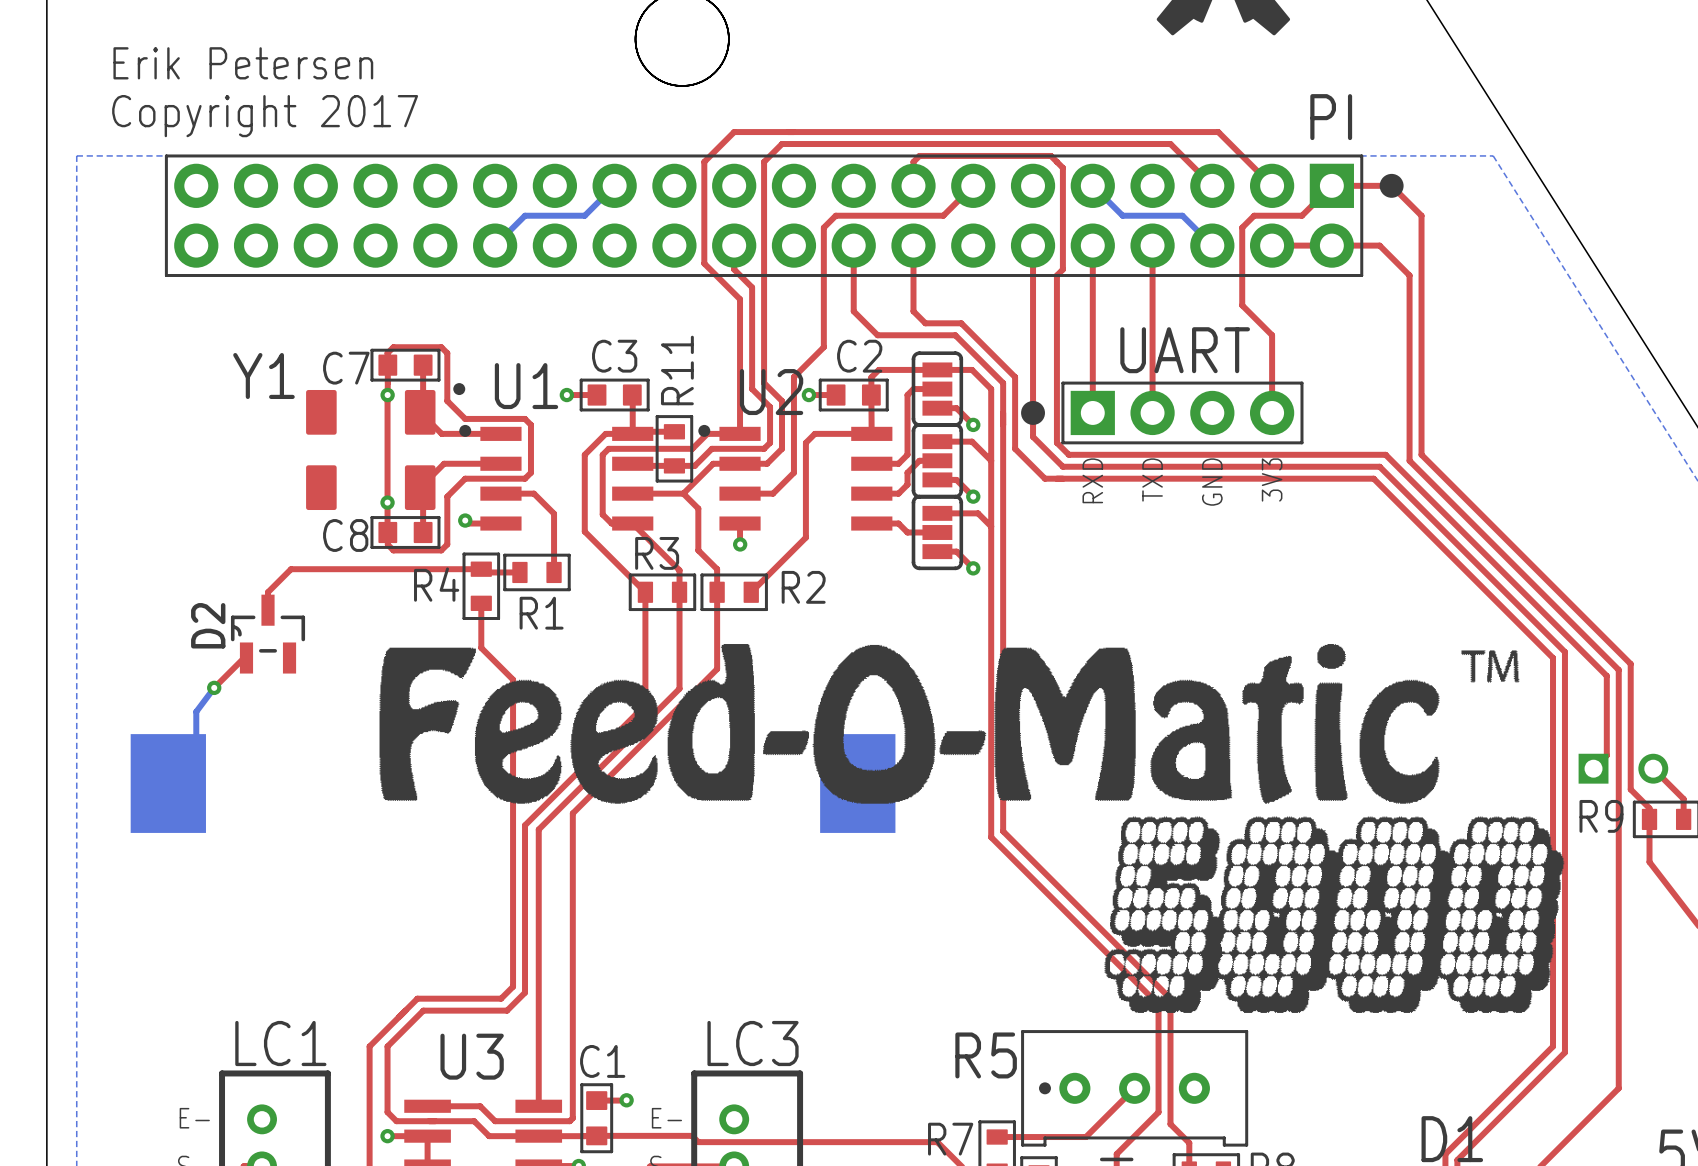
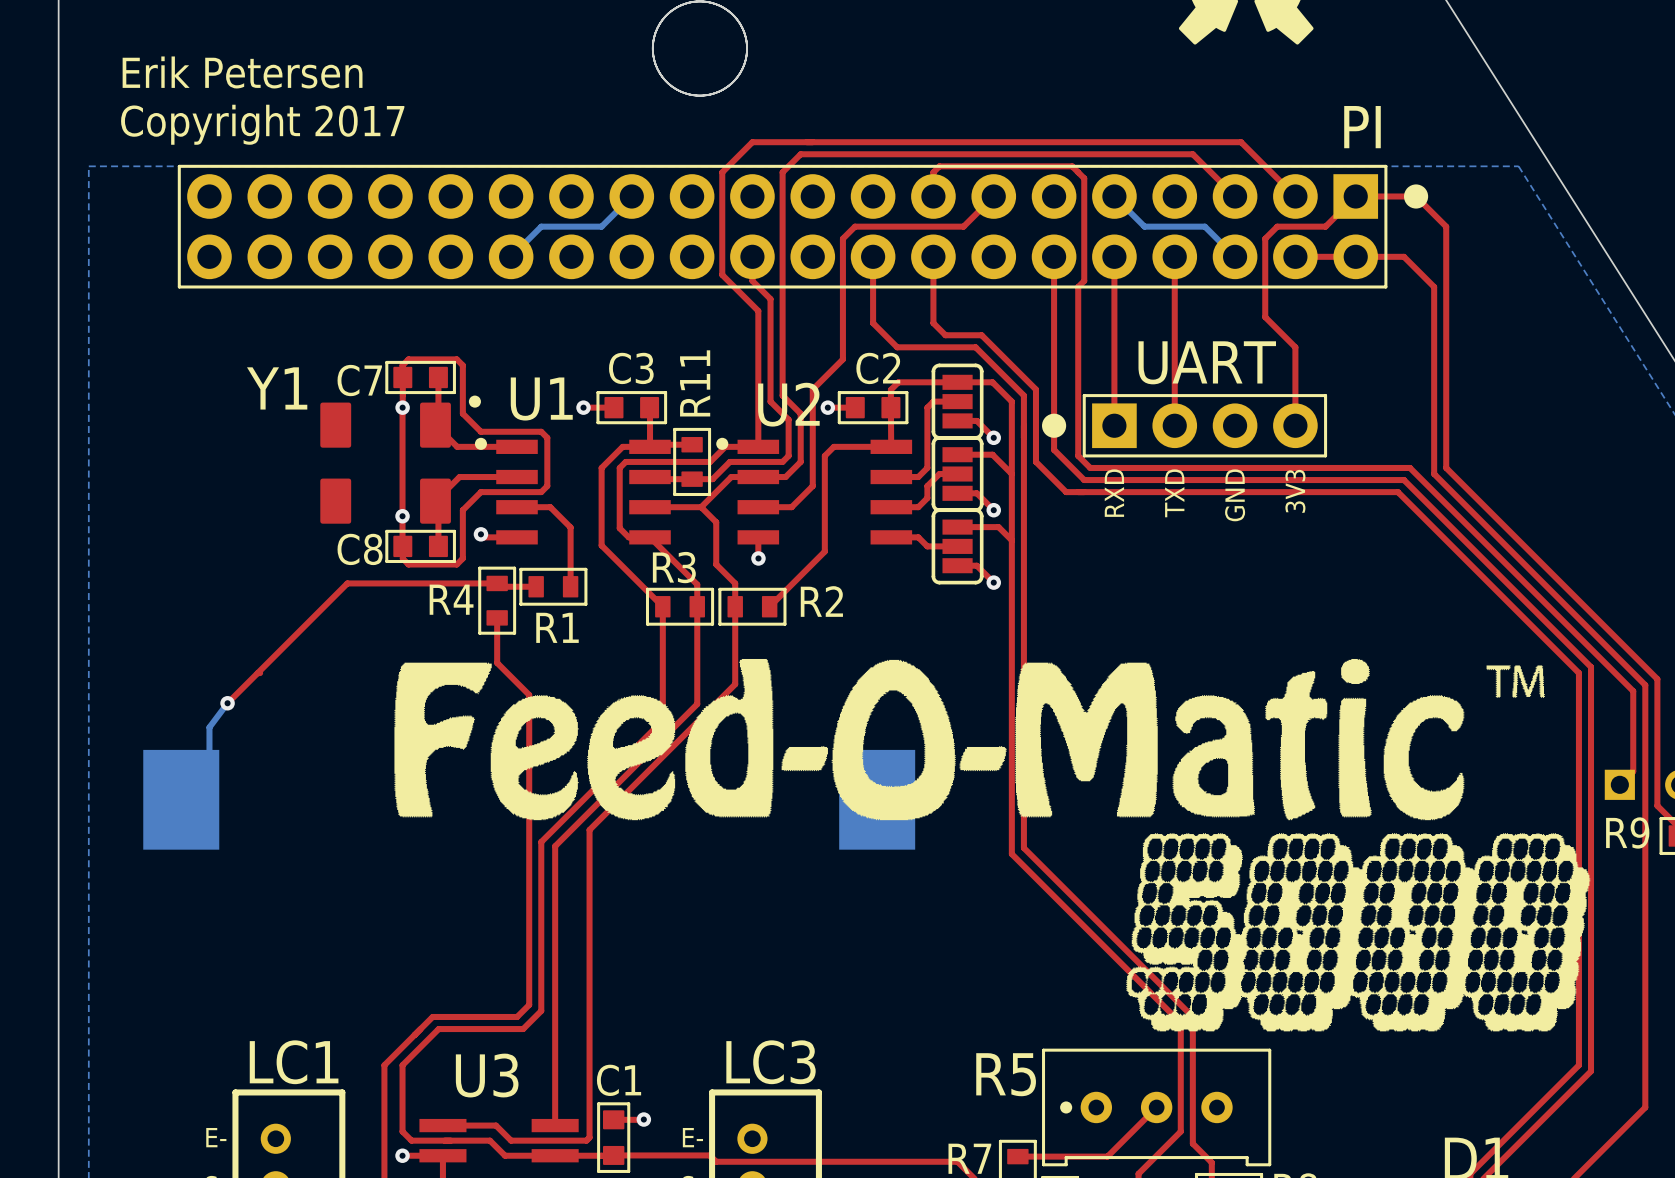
top track: (332, 569) (291, 569) (268, 592) (268, 610) -> (347, 583) (257, 673)
D2: (268, 634) -> none

